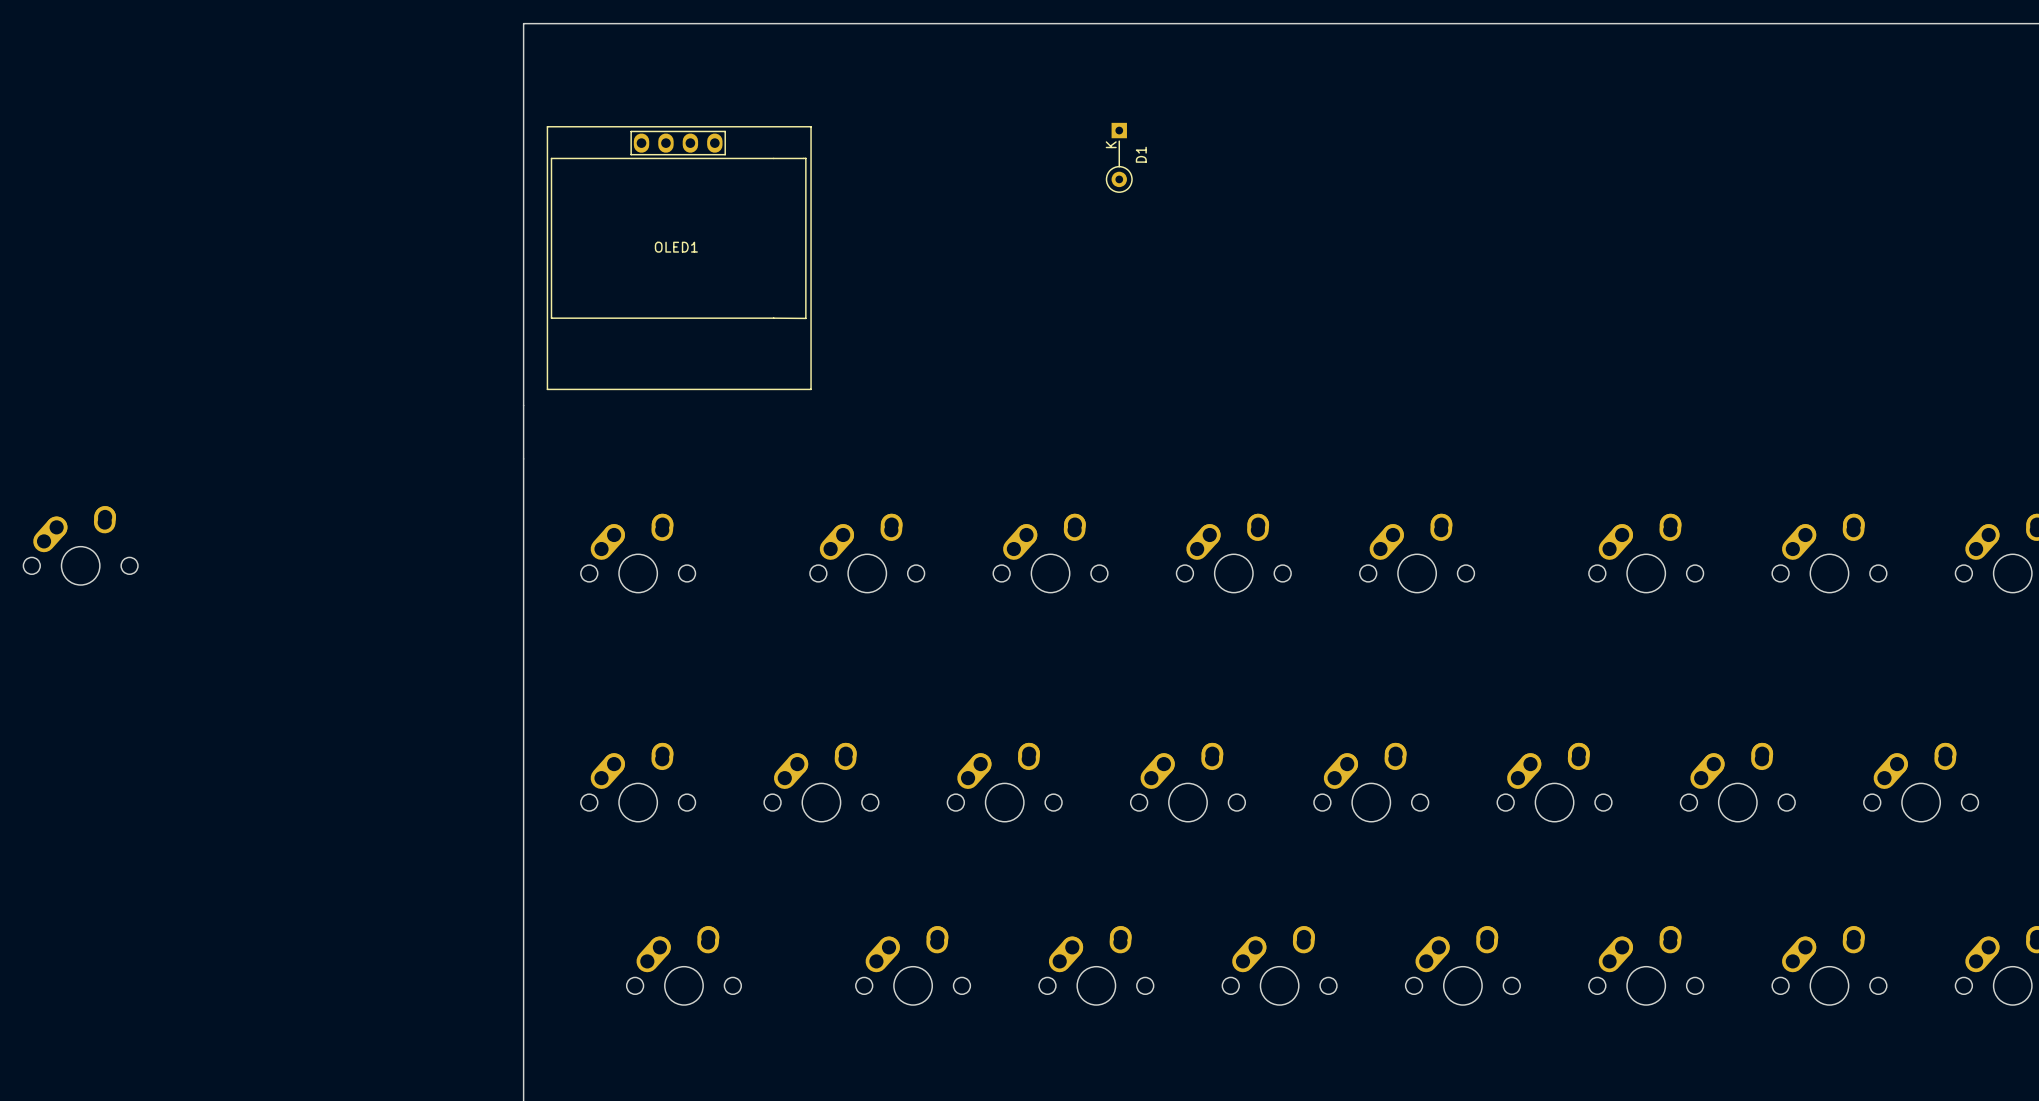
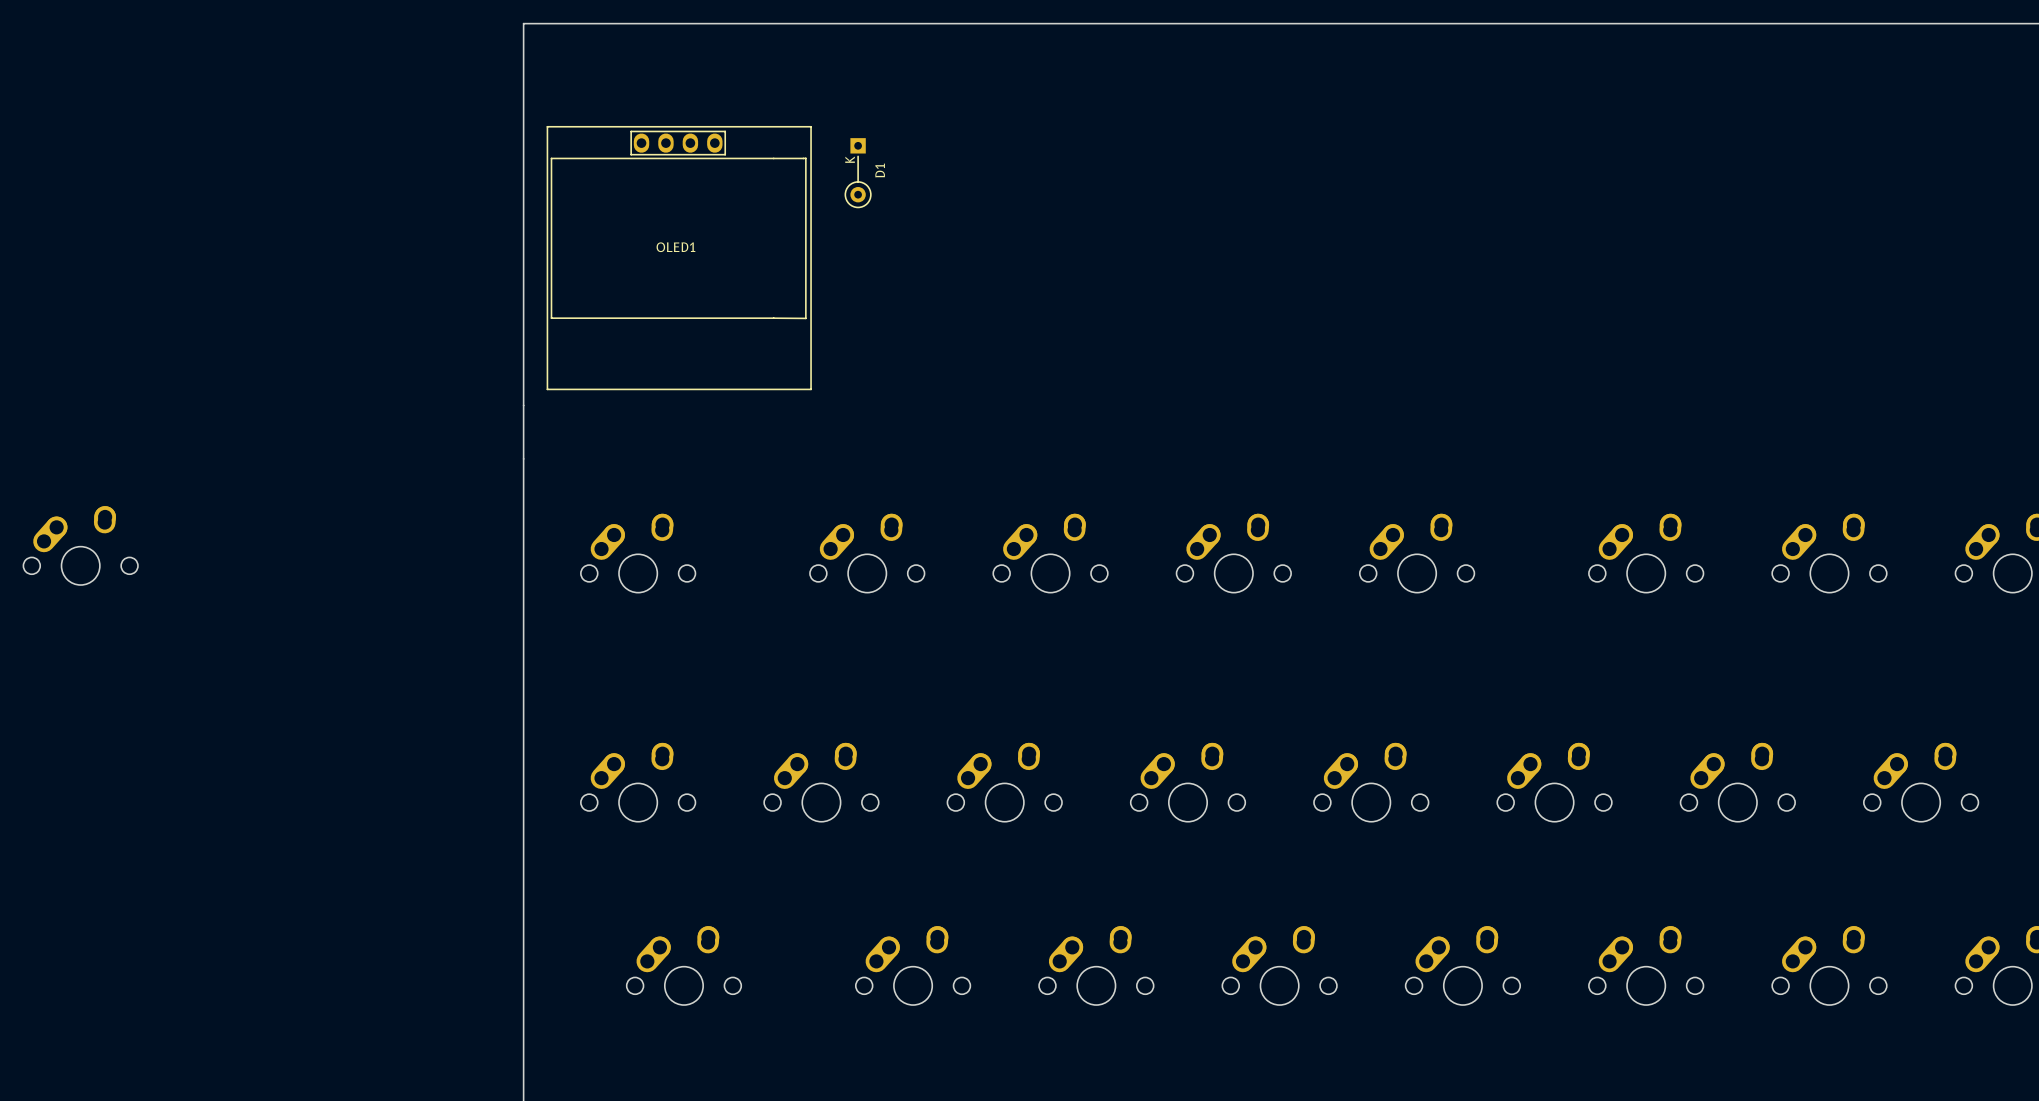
D1 position: (1119, 157) -> (858, 173)

